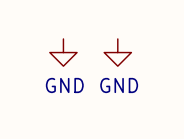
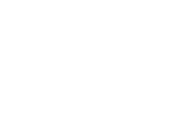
power symbol: GND (63, 52) -> none
power symbol: GND (117, 52) -> none

